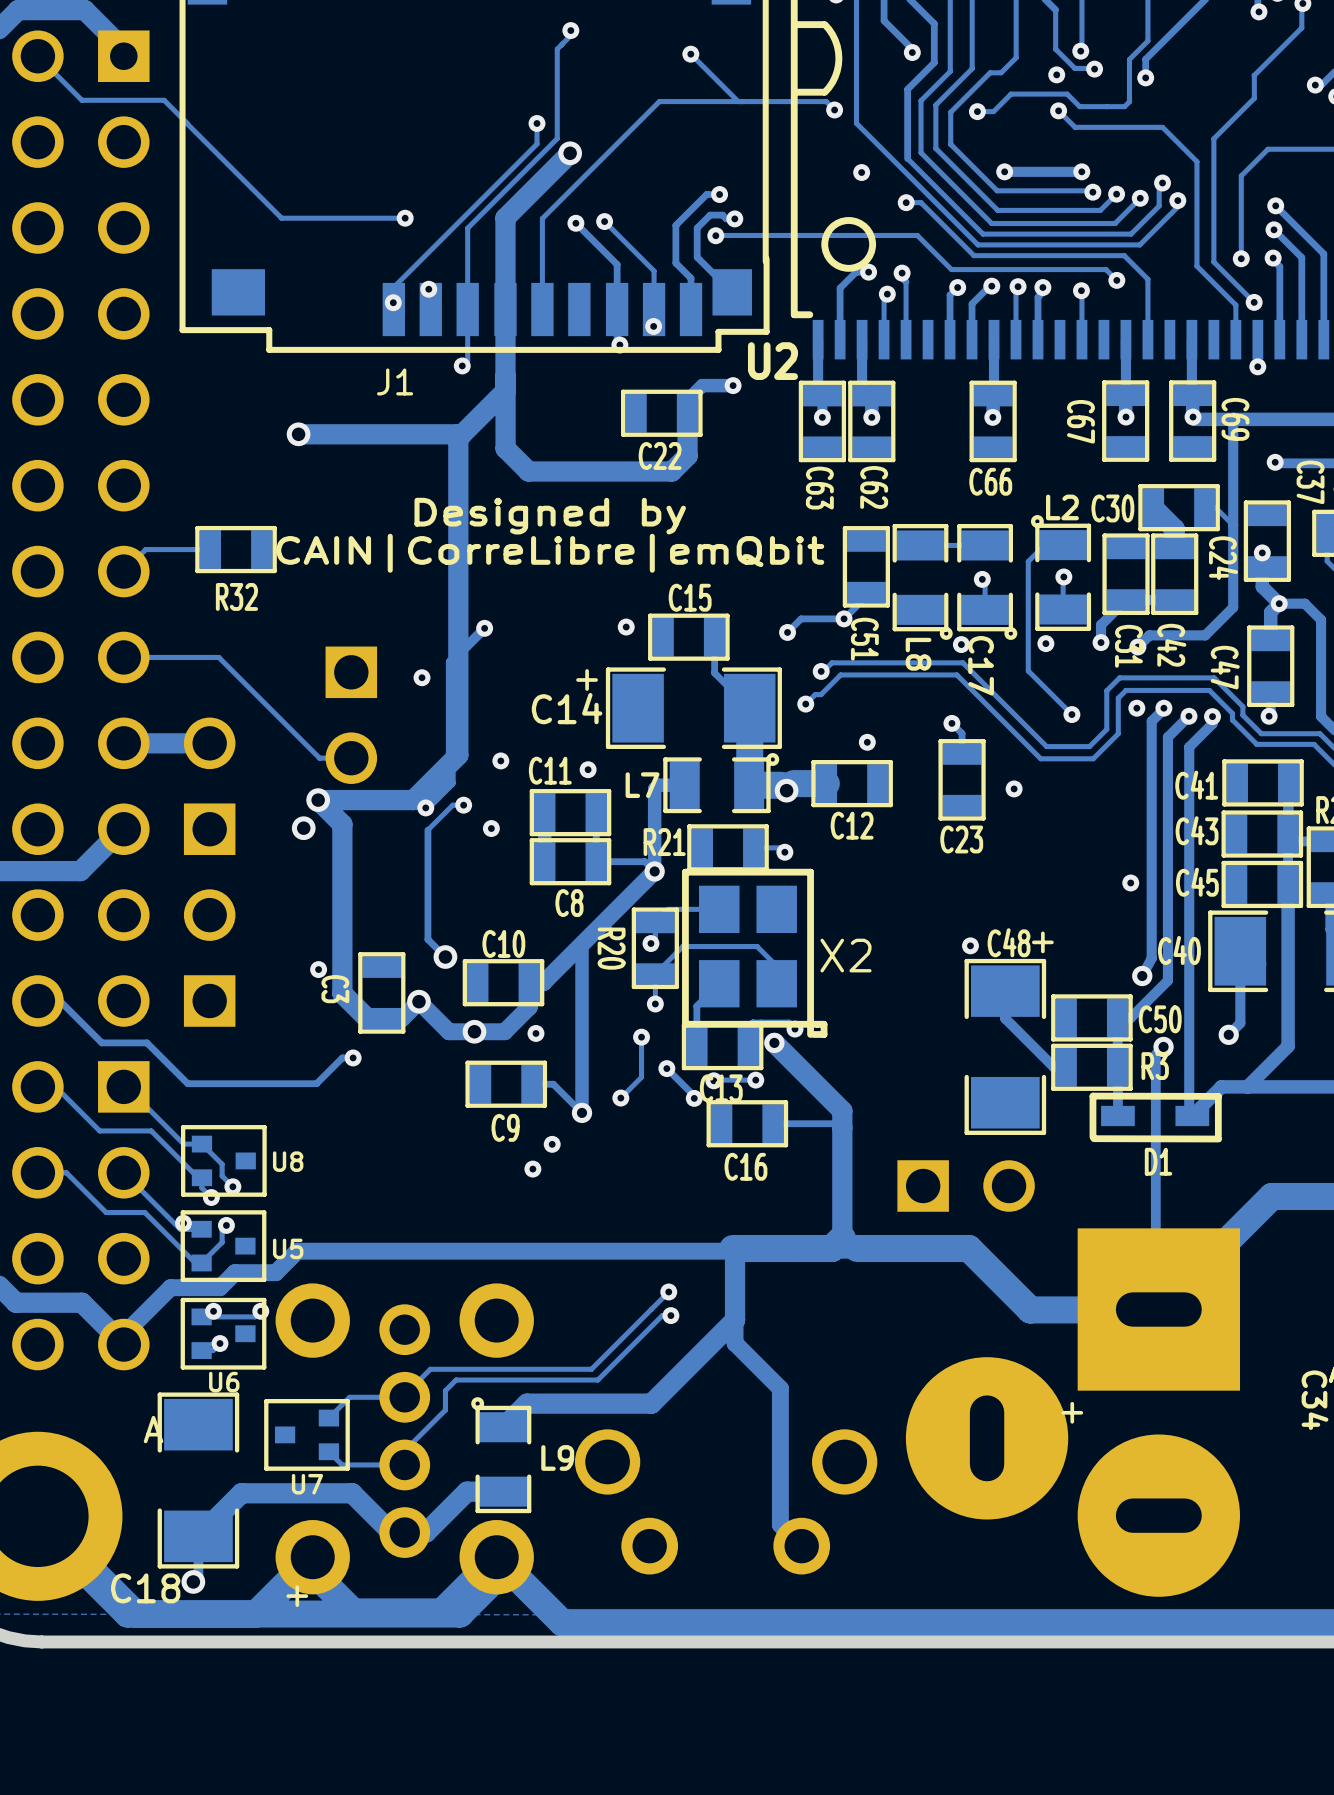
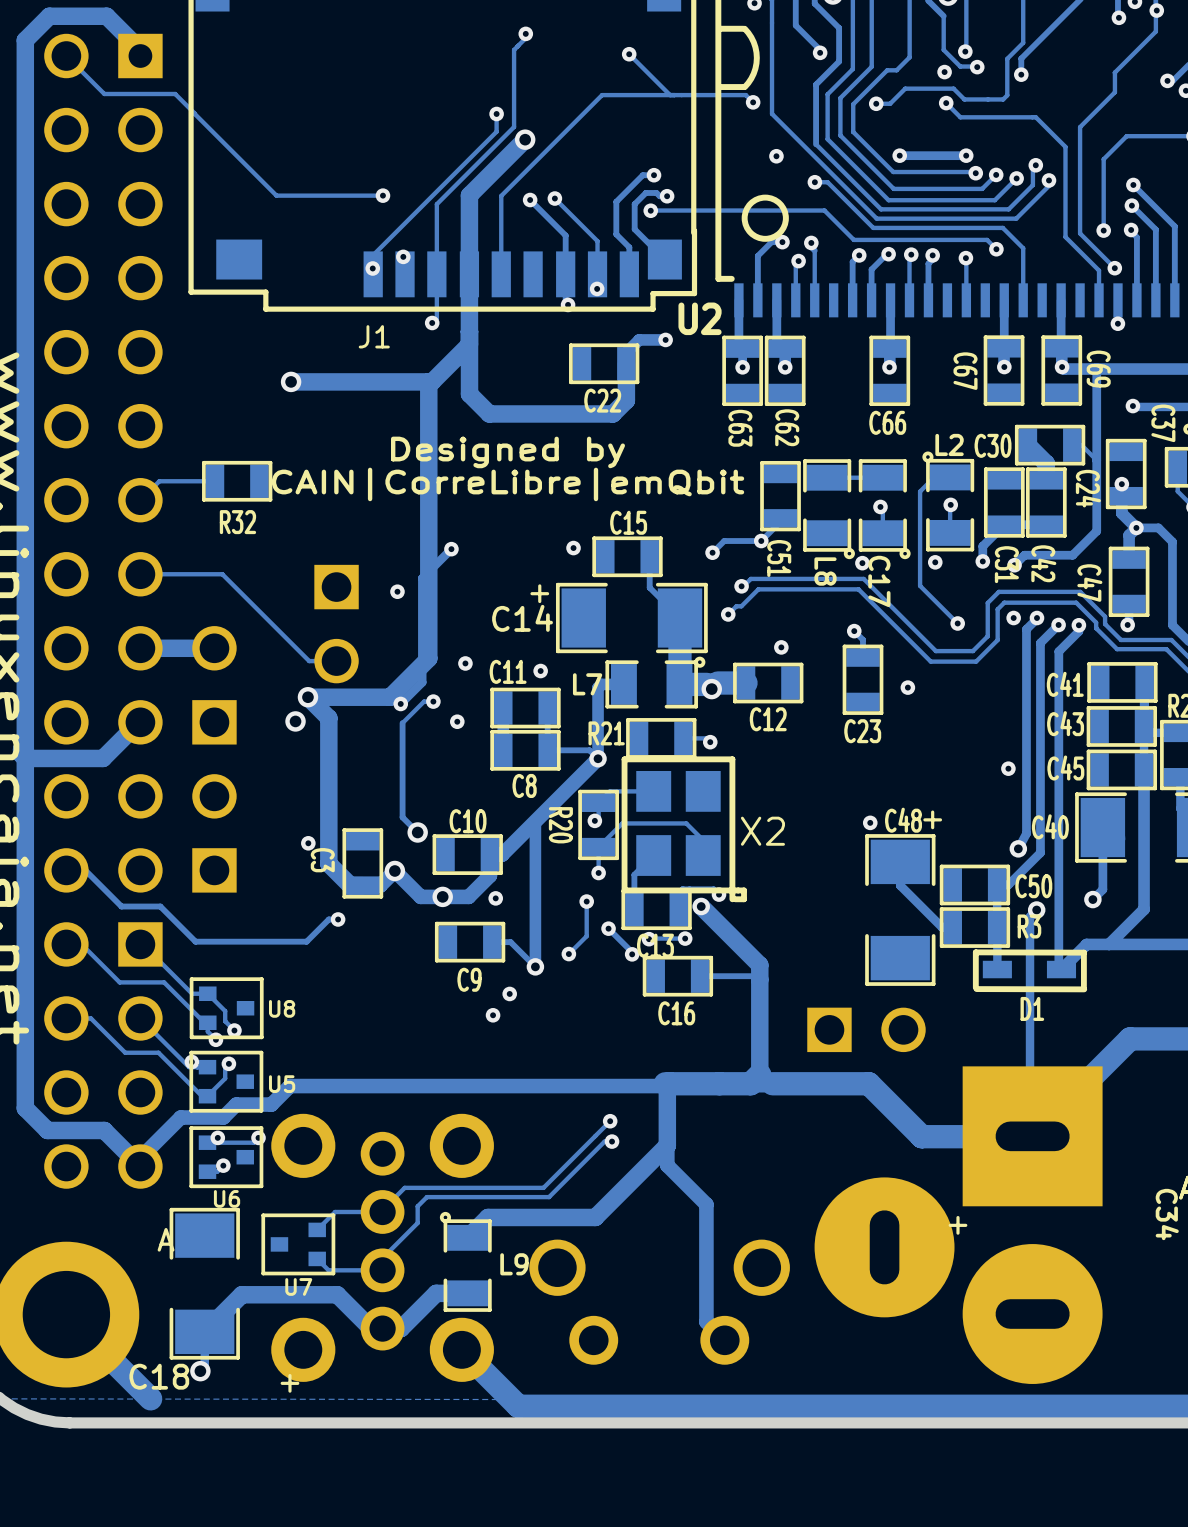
track: (37, 1516) (37, 1524) (127, 1614) (459, 1614) (496, 1577) (496, 1557) (442, 1611) (353, 1611) (312, 1571) (312, 1557) (255, 1614) -> none

